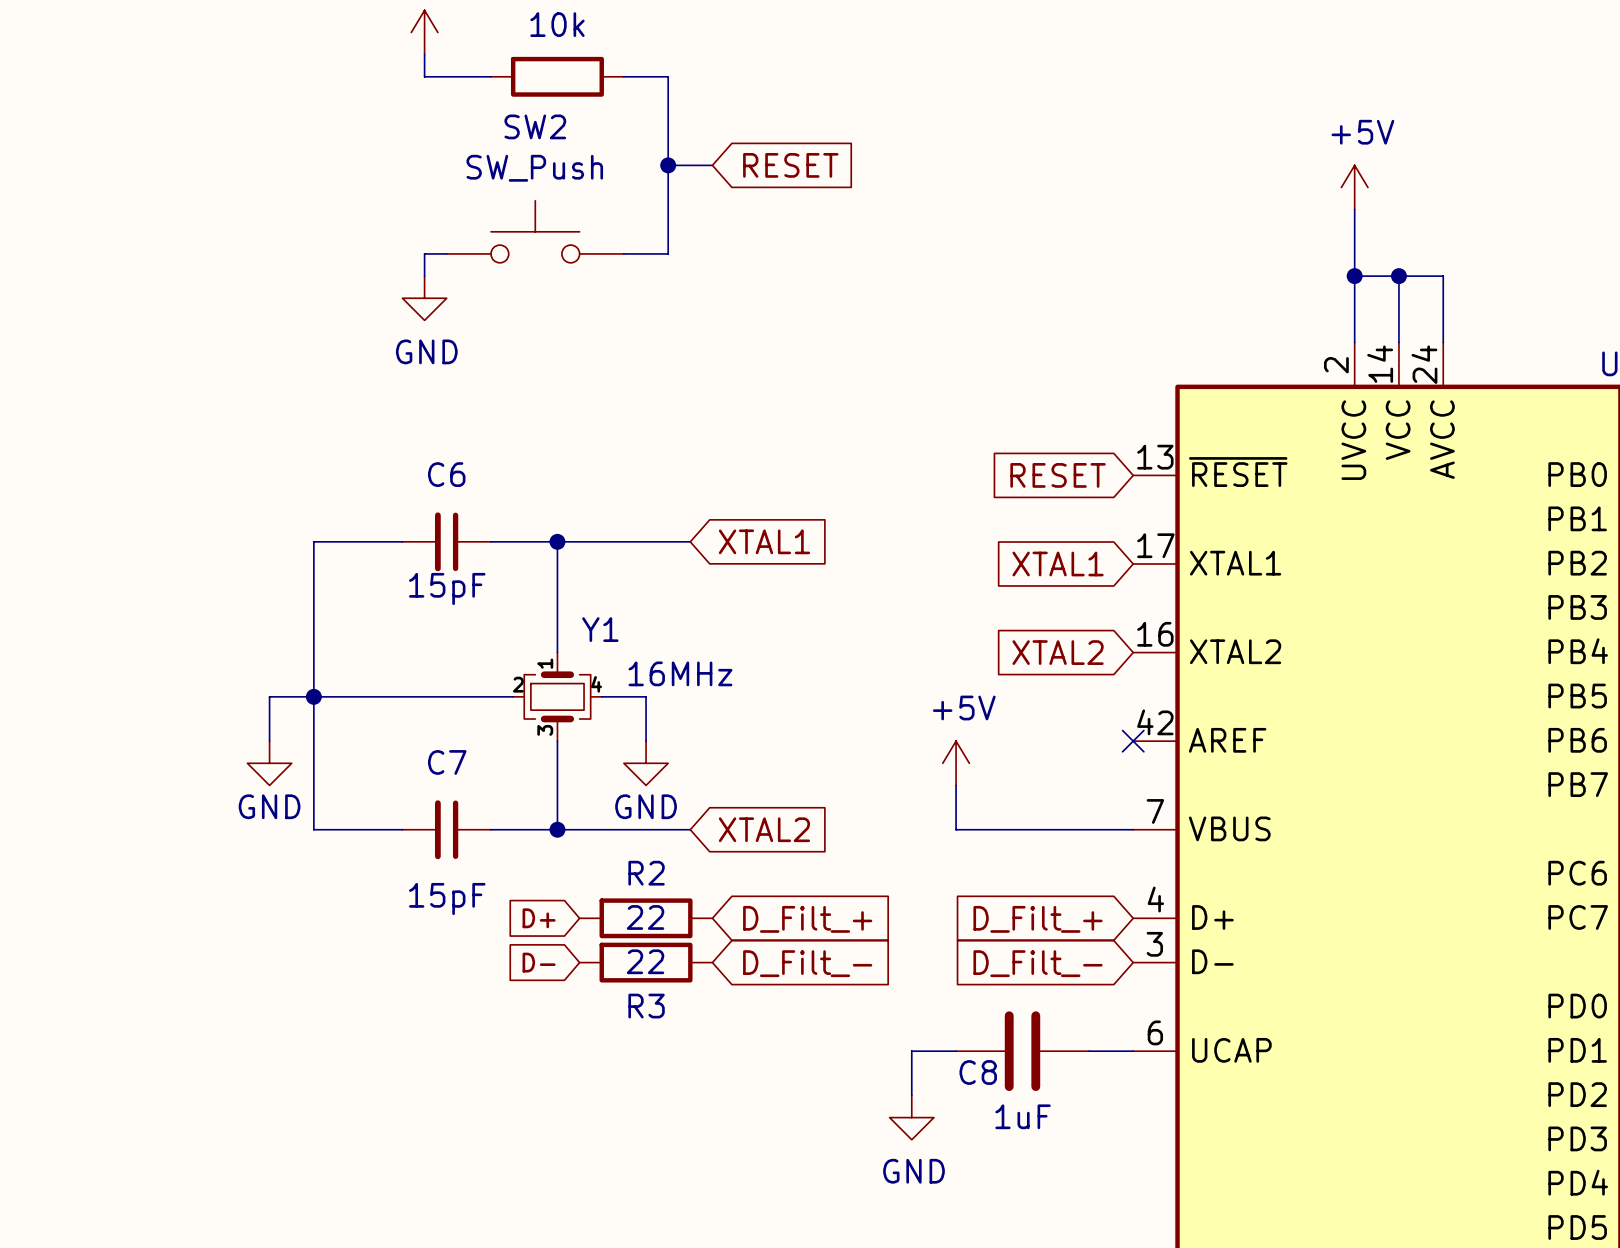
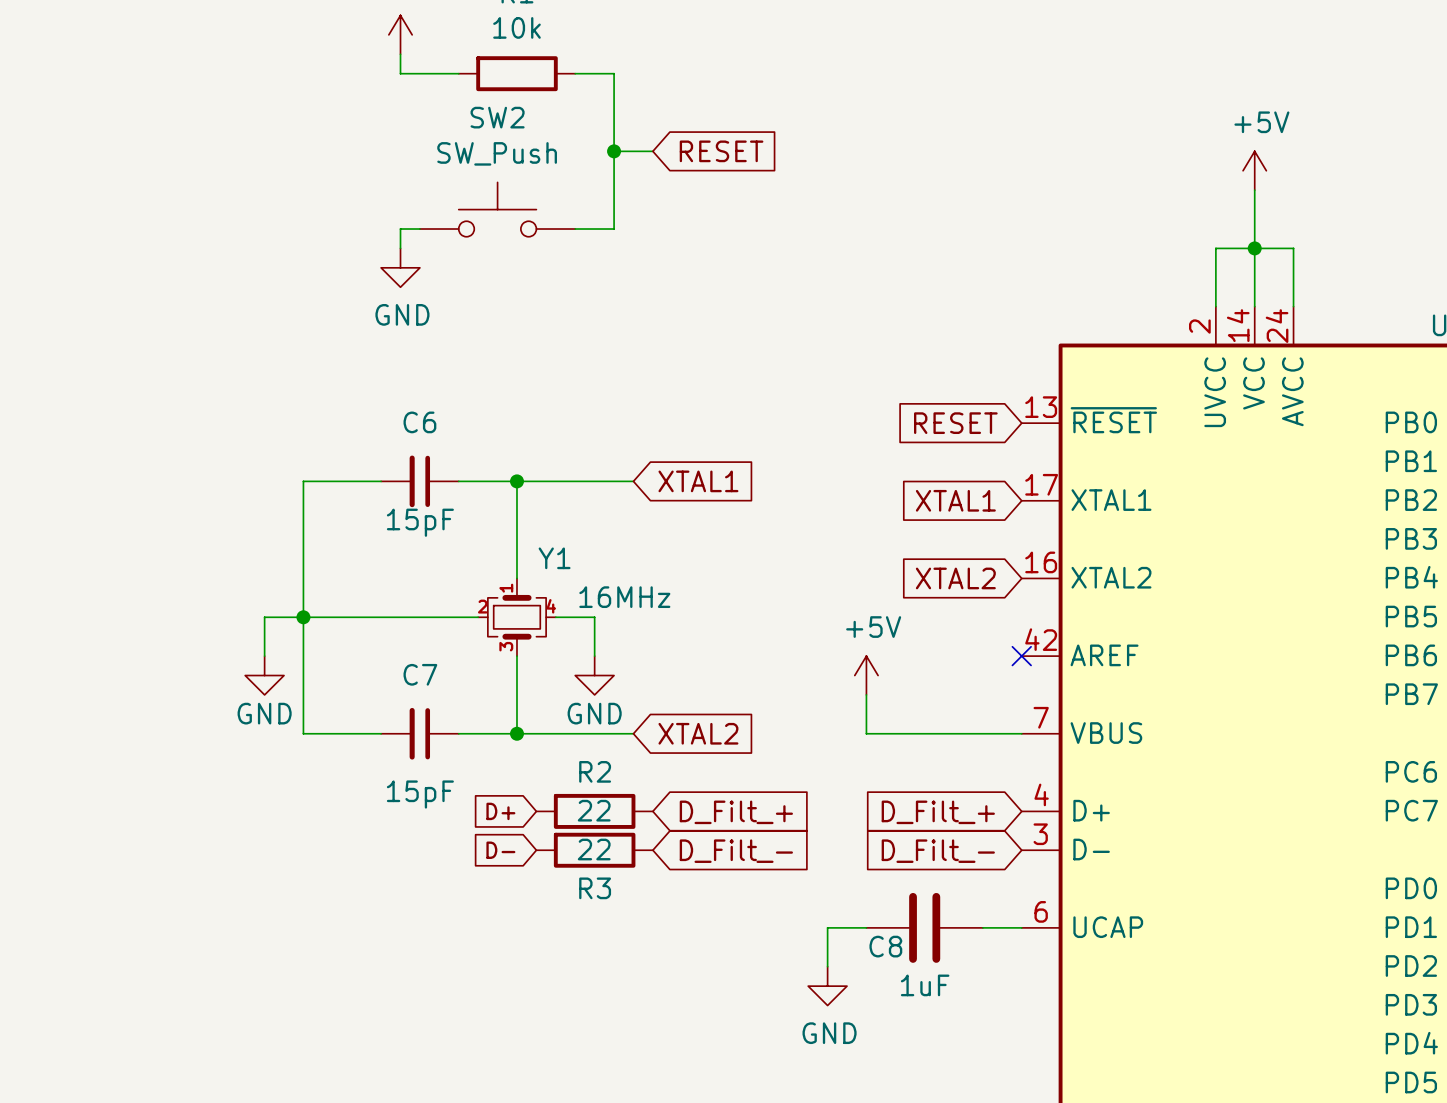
power symbol position: +5V (1354, 187) -> +5V (1254, 170)
wire: (1354, 209) (1354, 276) -> (1254, 190) (1254, 248)
junction: (1354, 276) -> none

